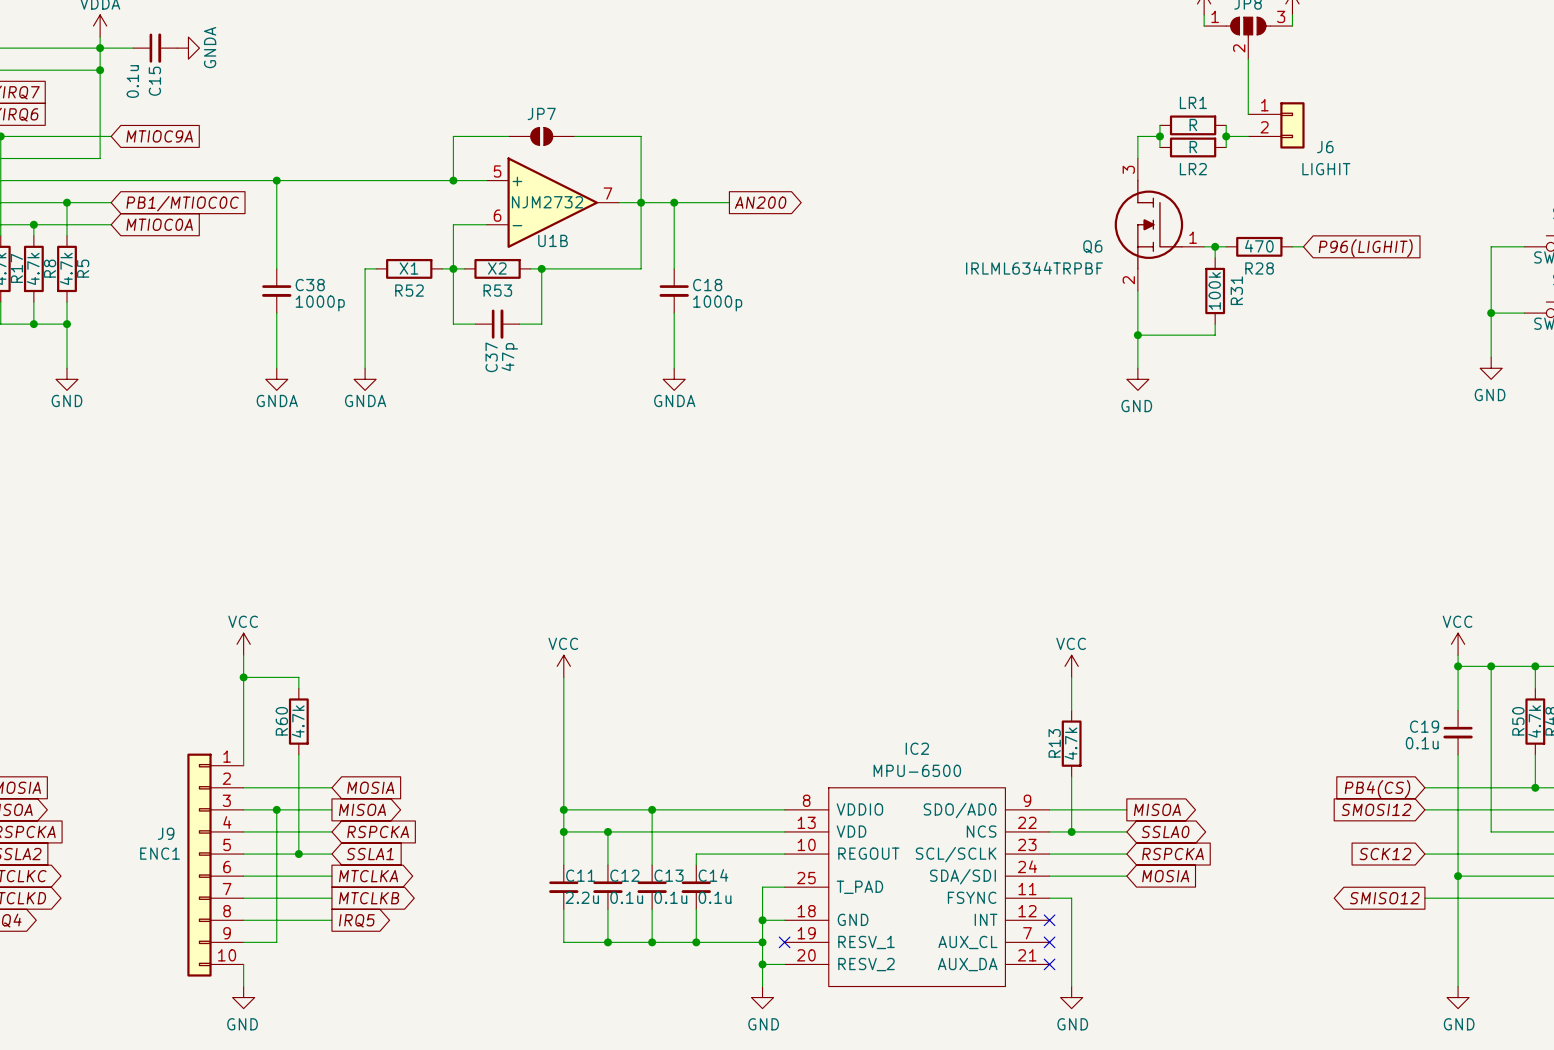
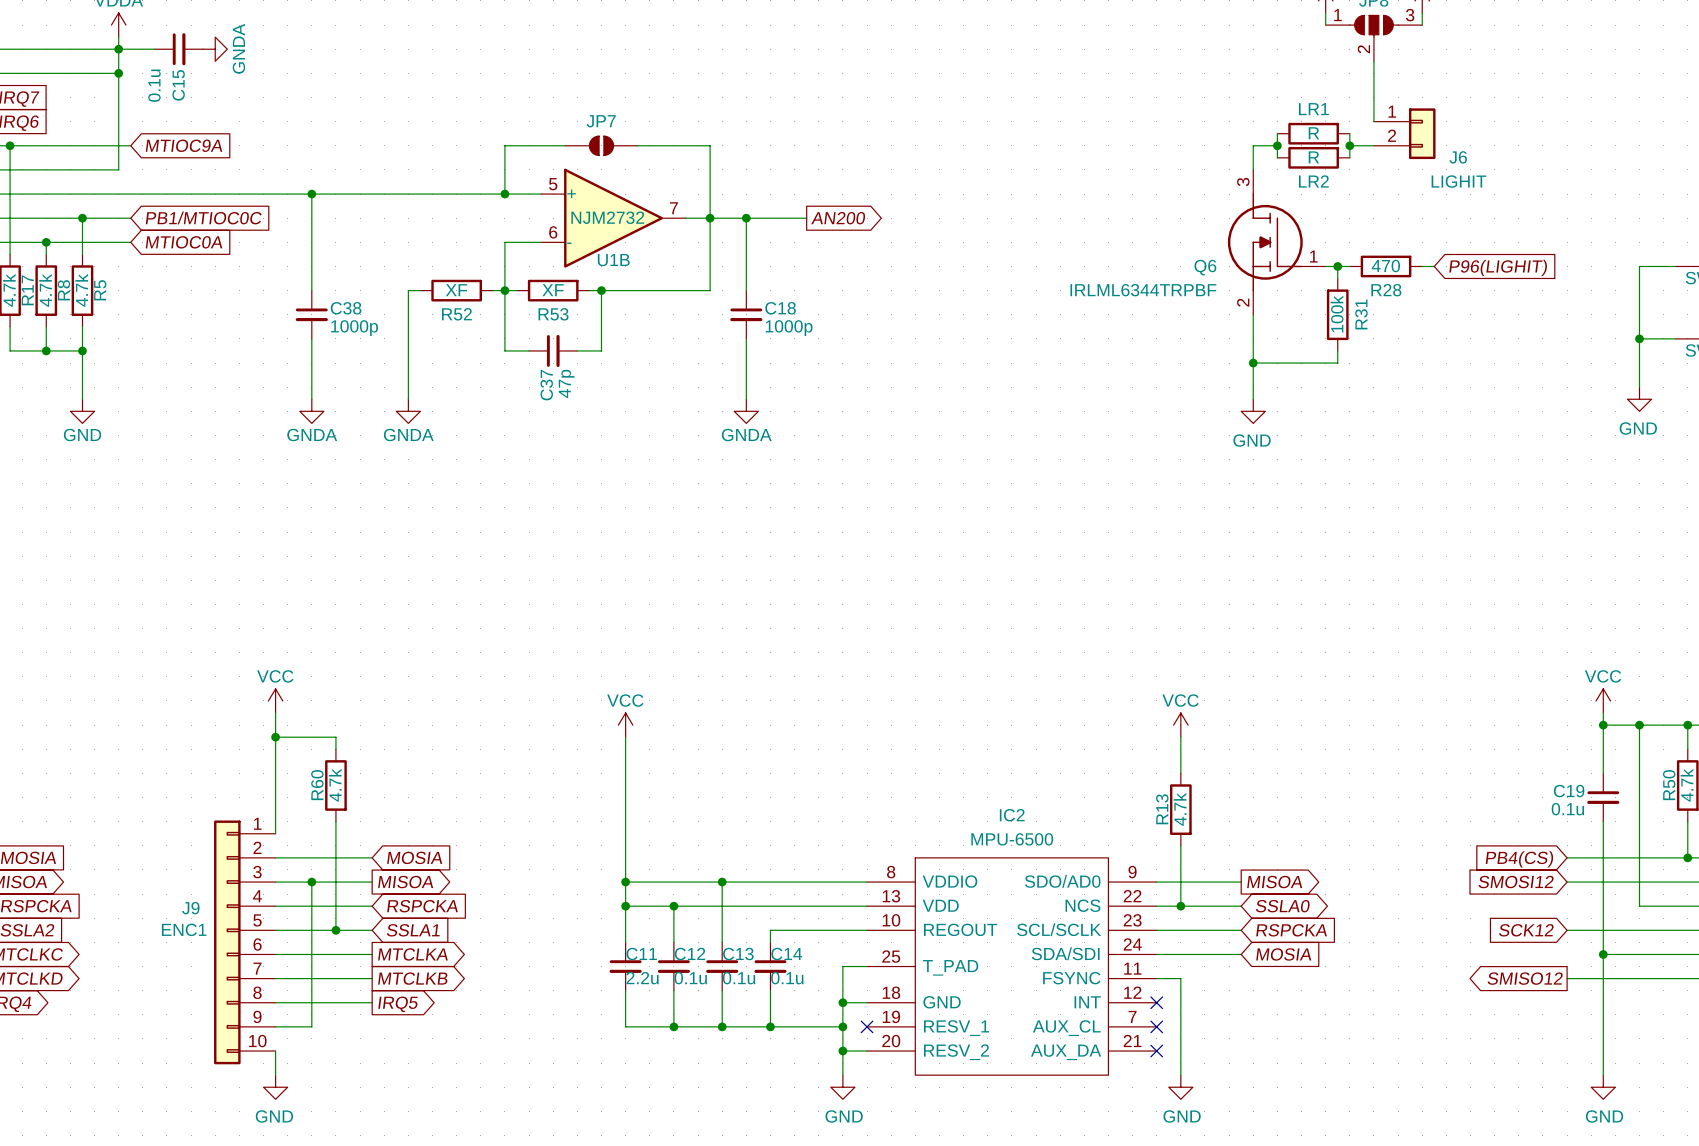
R52 value: X1 (408, 268) -> XF (456, 290)
R53 value: X2 (497, 268) -> XF (553, 290)

